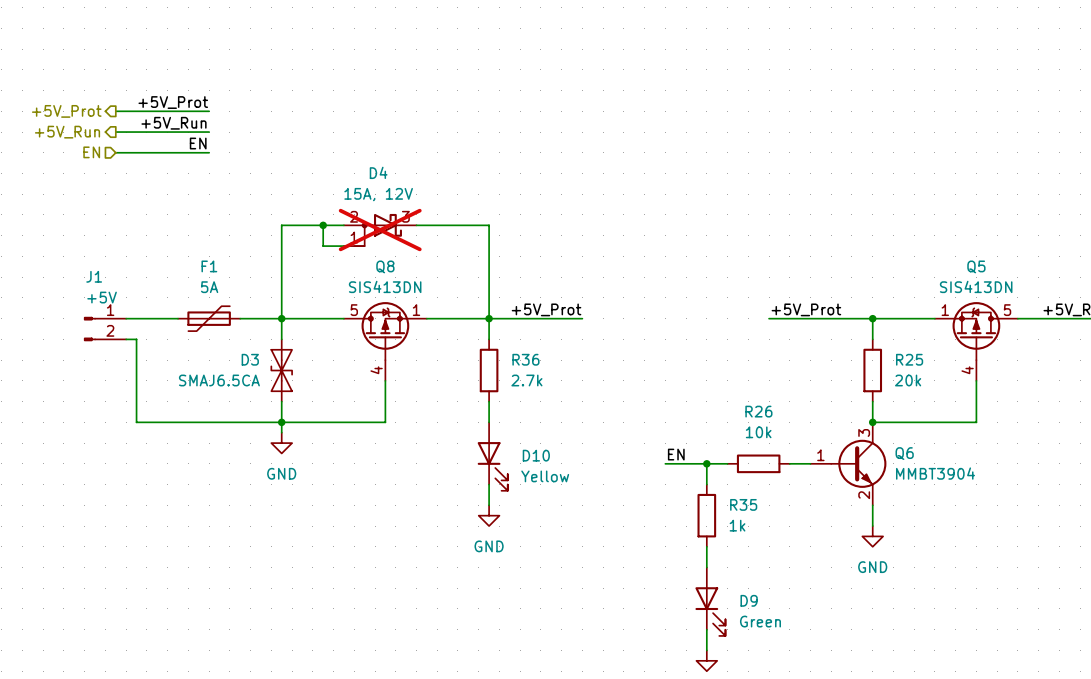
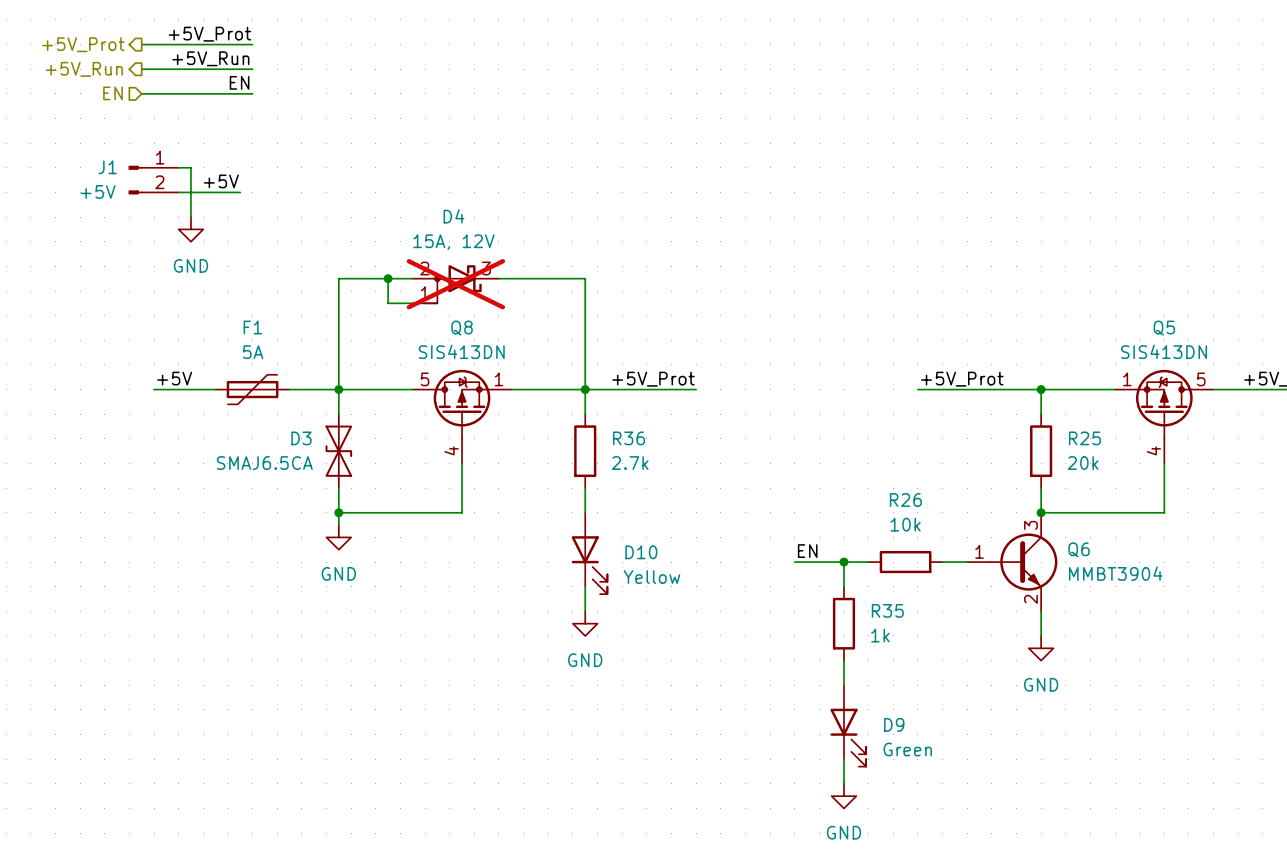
wire: none -> (141, 44) (252, 44)
wire: none -> (141, 69) (252, 69)
label position: +5V_Prot (173, 102) -> +5V_Prot (209, 34)
hierarchical label position: +5V_Prot (66, 111) -> +5V_Prot (83, 44)
wire: (115, 111) (209, 111) -> (141, 93) (252, 93)
label position: +5V_Run (173, 123) -> +5V_Run (210, 58)
hierarchical label position: +5V_Run (67, 132) -> +5V_Run (84, 69)
wire: (157, 132) (209, 132) -> (190, 167) (190, 217)
label: none -> +5V (221, 181)
label position: EN (198, 143) -> EN (239, 82)
hierarchical label position: EN (91, 152) -> EN (113, 93)
wire: (198, 152) (209, 152) -> none
power symbol: none -> GND (190, 229)
J1 name position: J1 (94, 276) -> J1 (107, 167)
J1 value position: +5V (102, 297) -> +5V (98, 191)
label: none -> +5V (174, 378)
J1 position: (105, 329) -> (153, 180)
wire: (126, 339) (136, 339) (136, 422) (281, 422) -> none

